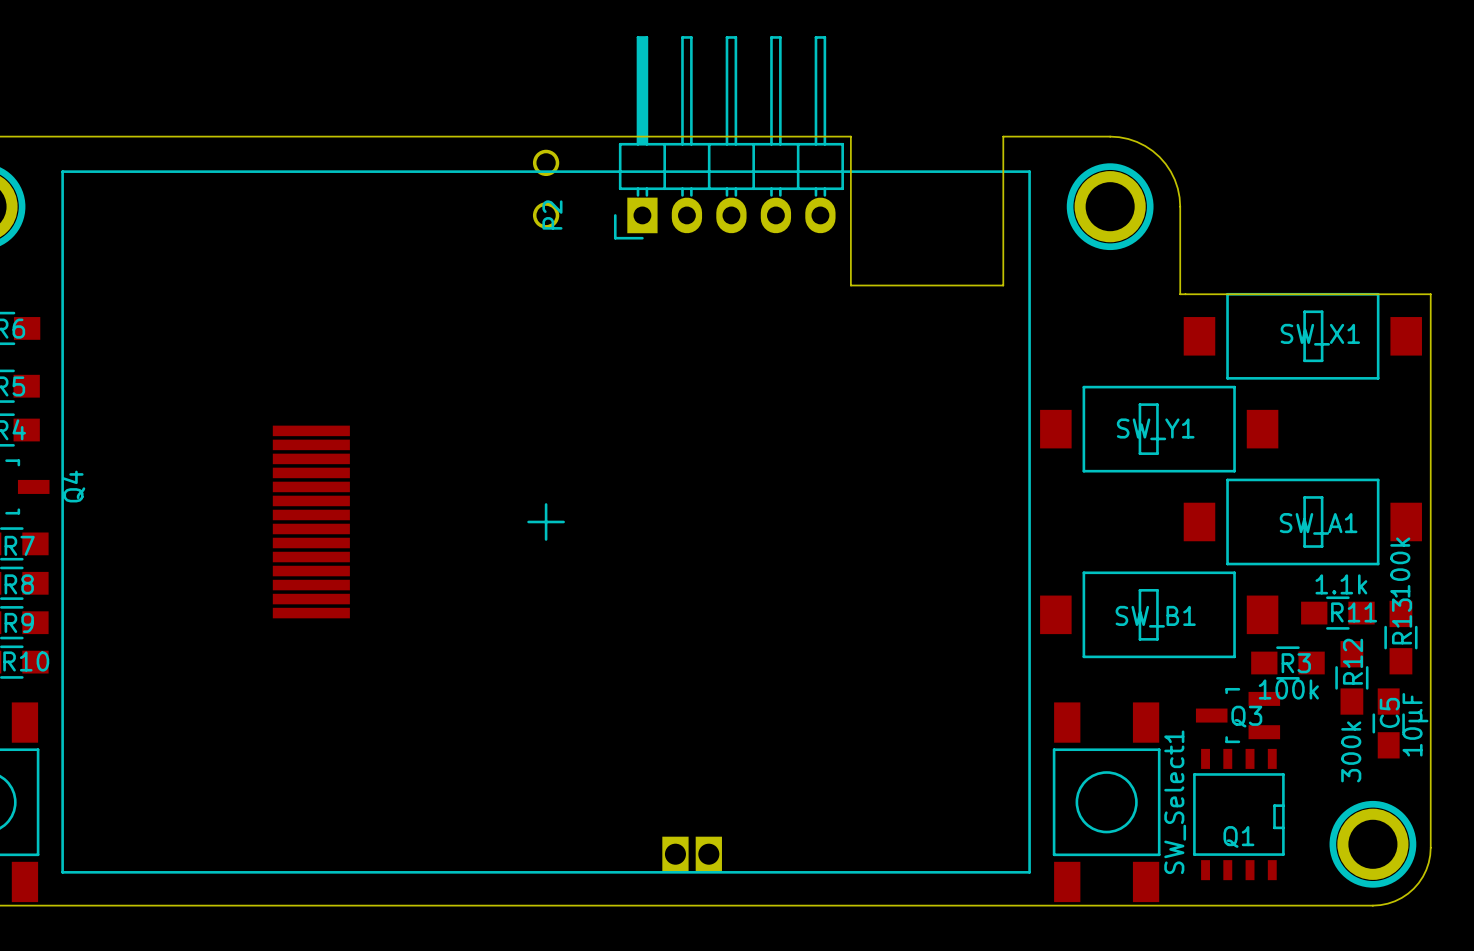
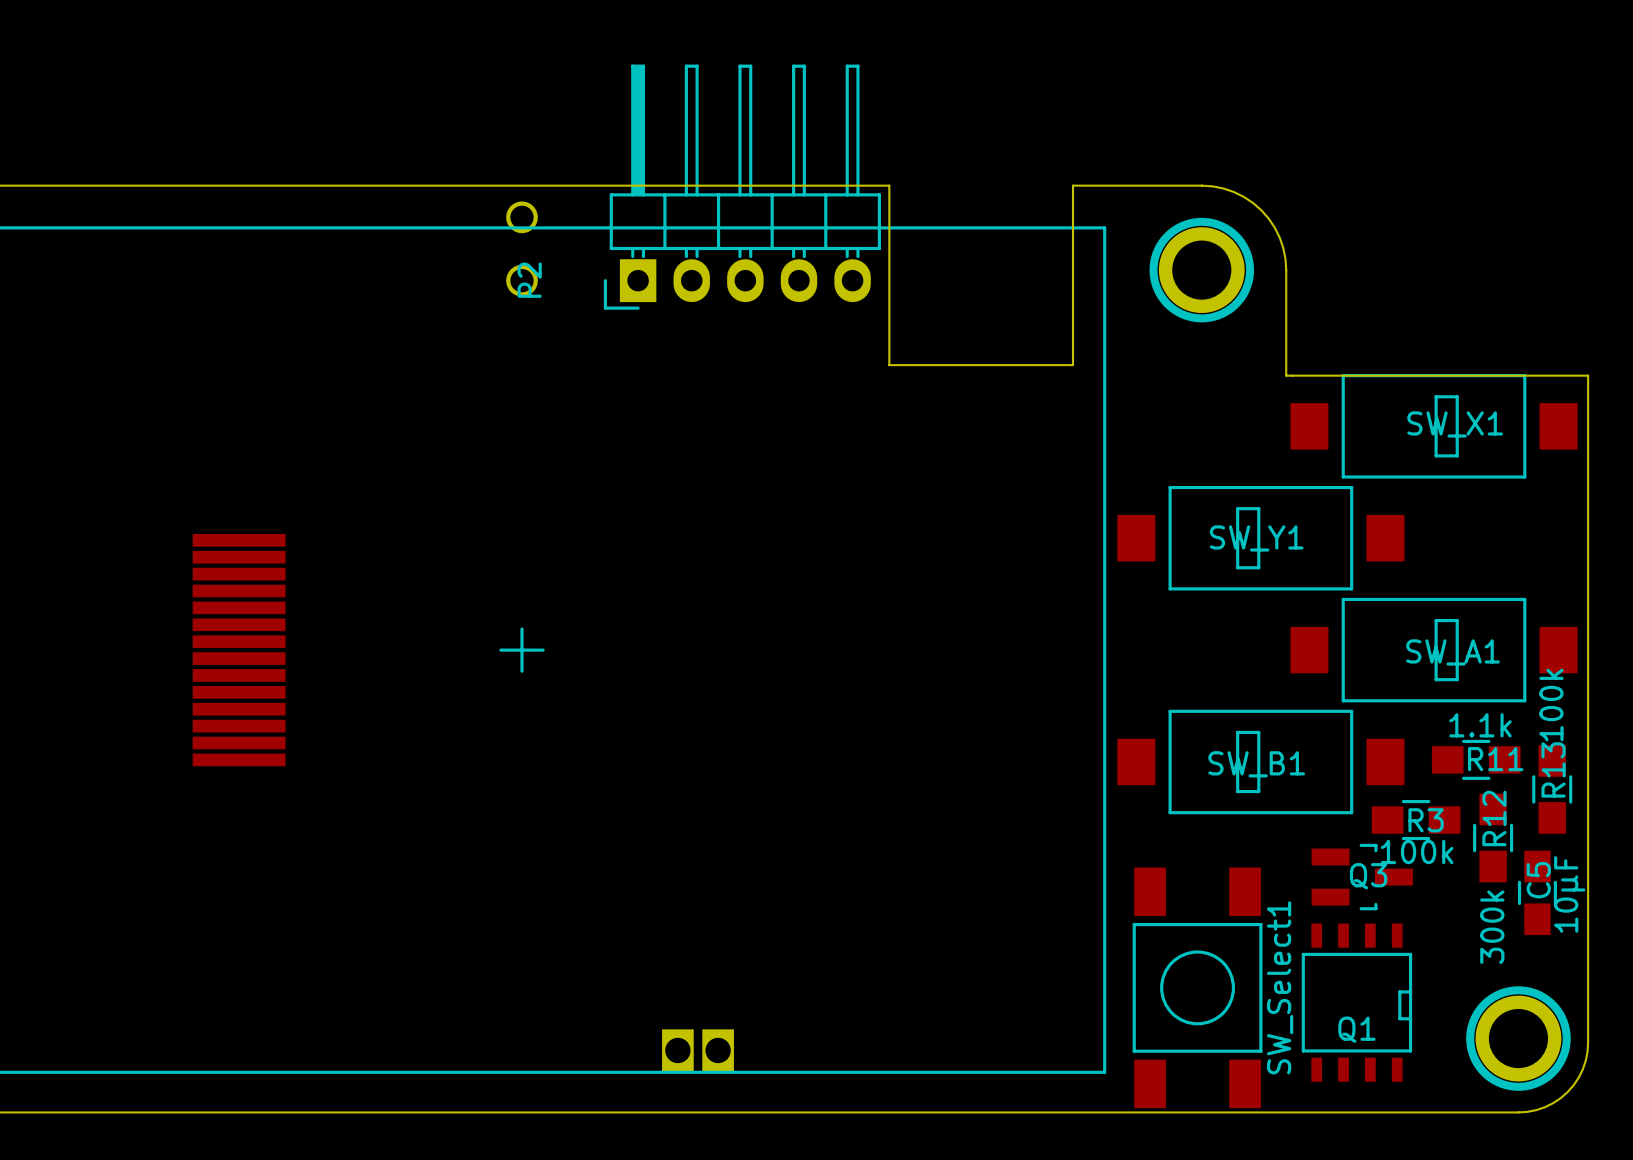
Q3 rotation: 0° (1238, 715) -> 180° (1362, 877)

